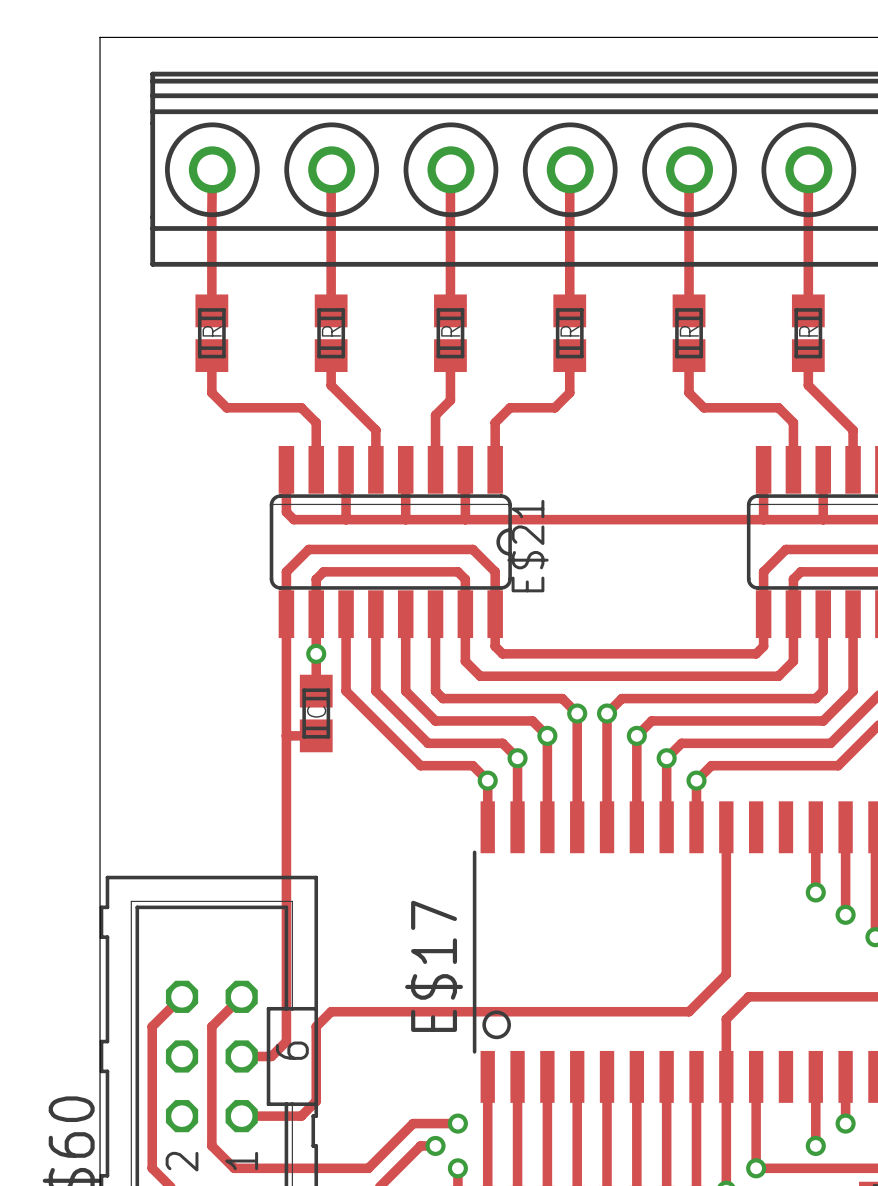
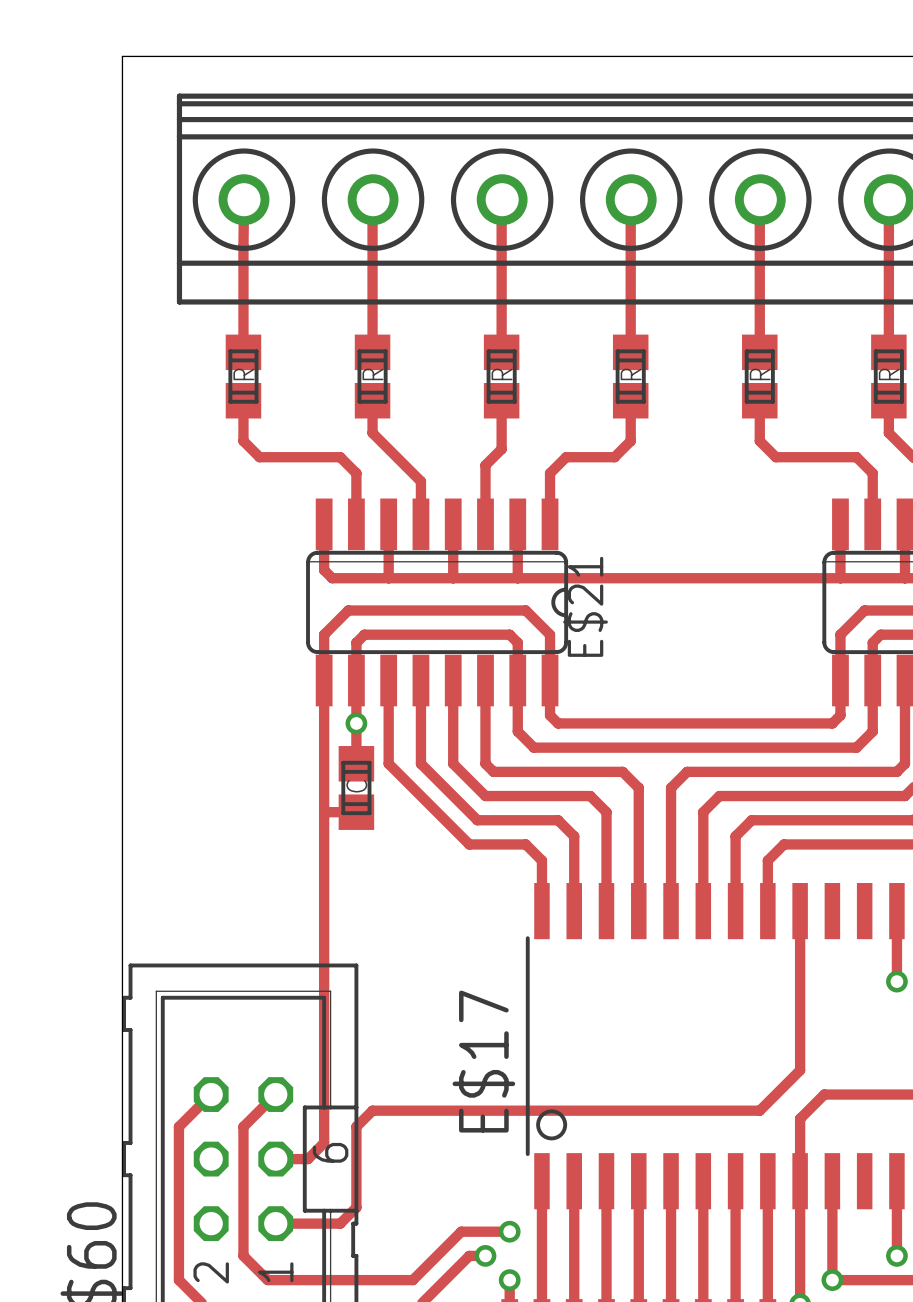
via: (577, 713) -> none
via: (607, 713) -> none
via: (547, 735) -> none
via: (636, 735) -> none
via: (517, 758) -> none
via: (666, 758) -> none
via: (487, 780) -> none
via: (696, 780) -> none

